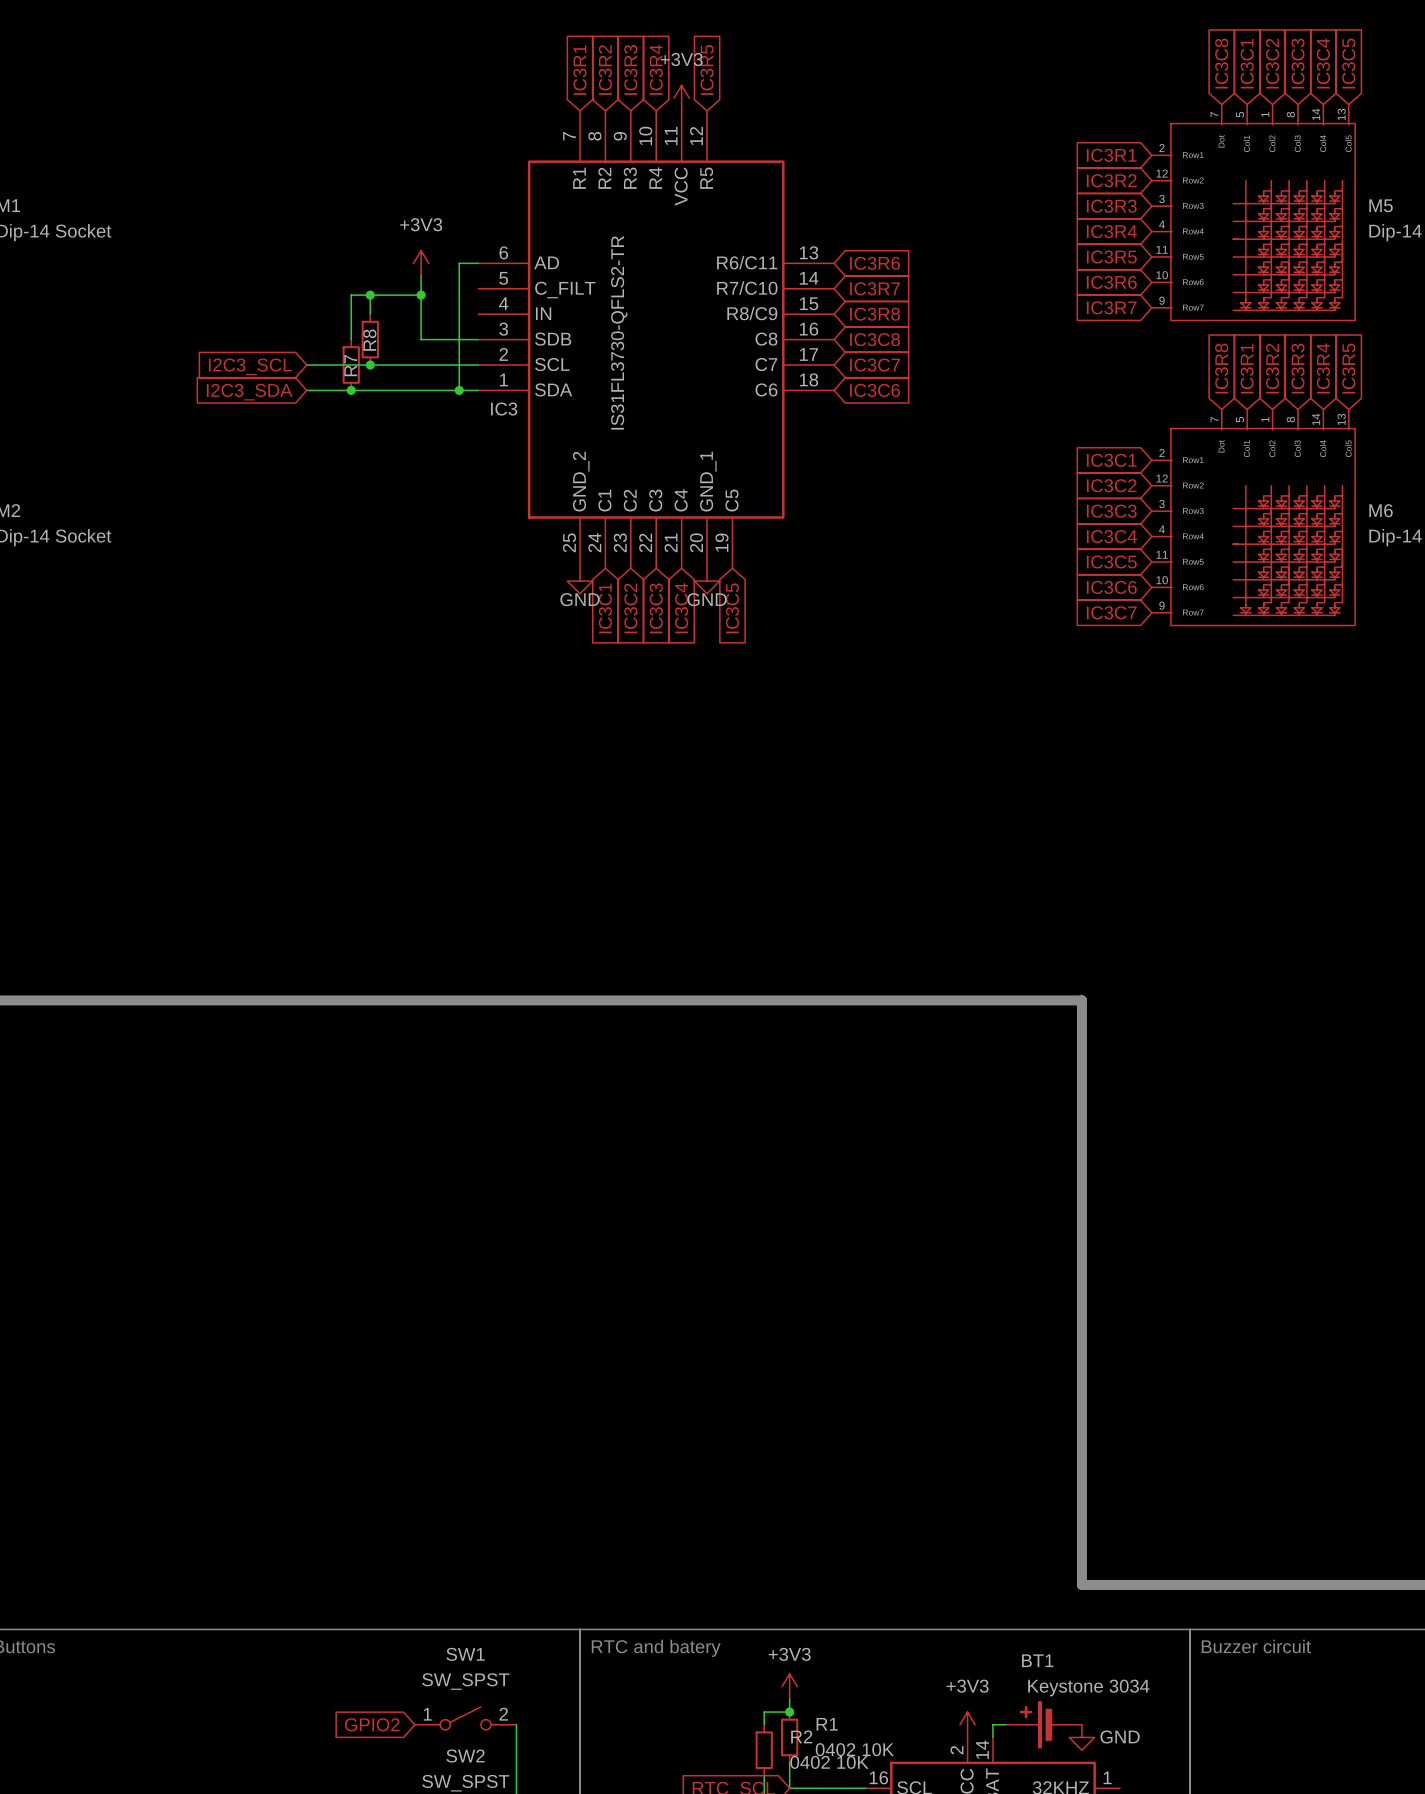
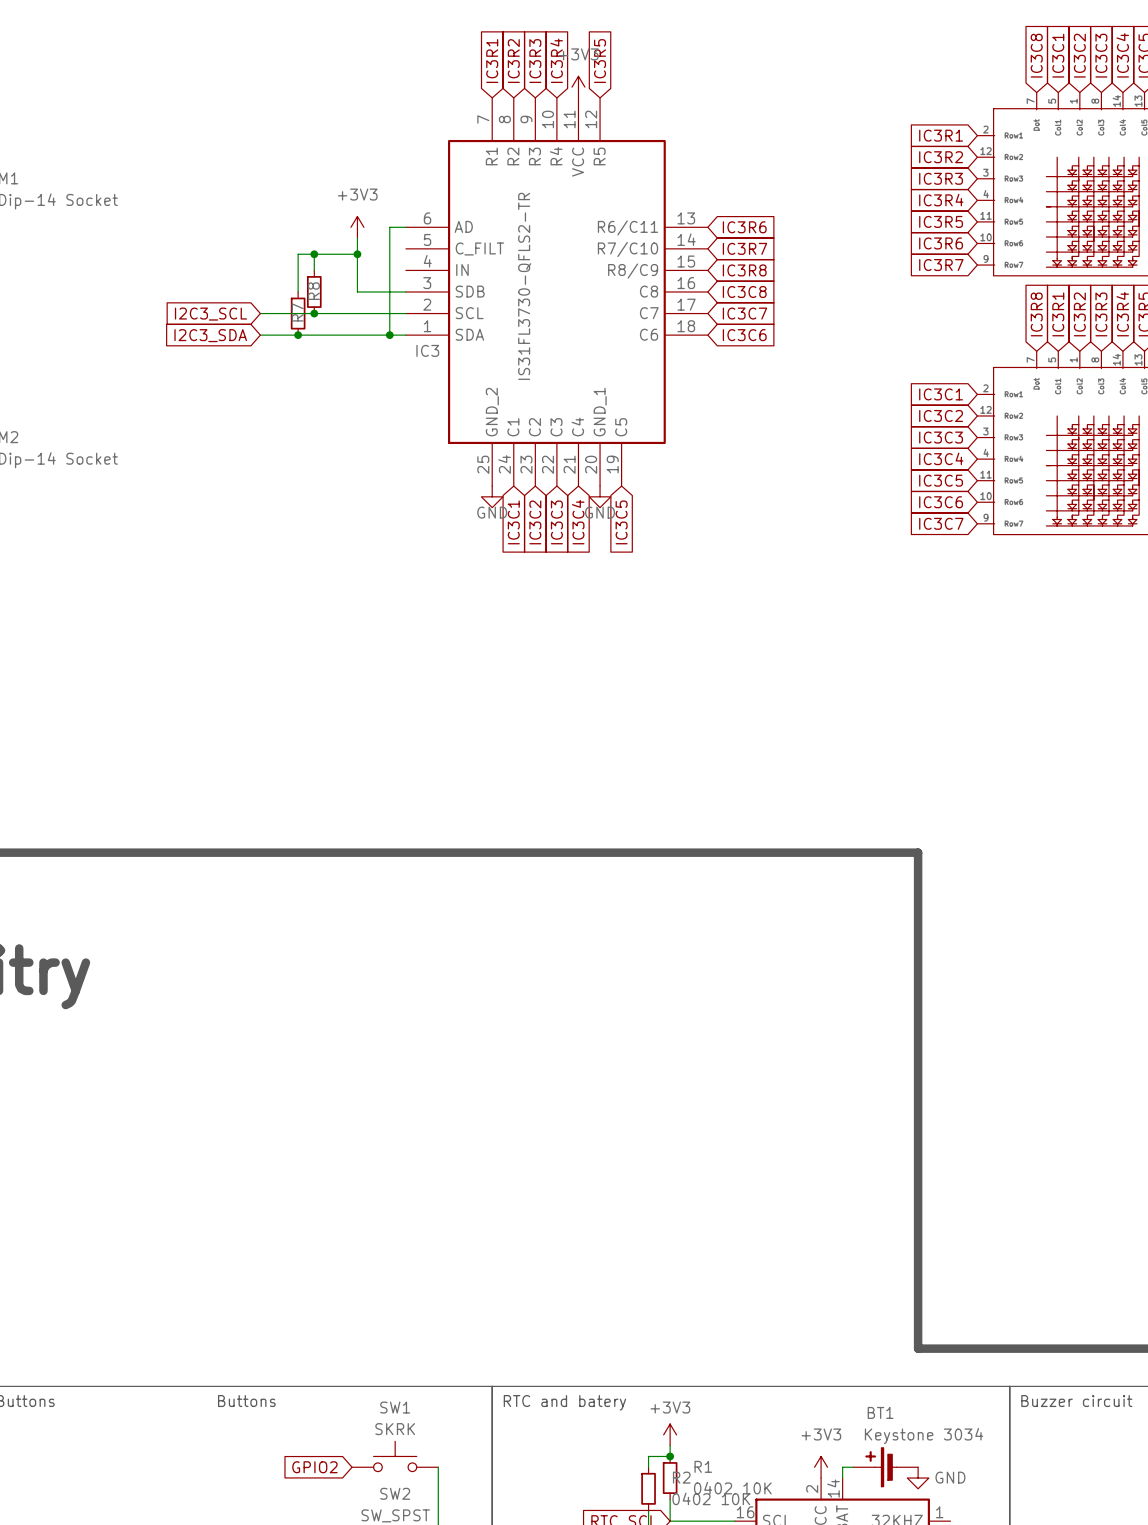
text: none -> Buttons (246, 1401)
SW1 value: SW_SPST (465, 1681) -> SKRK (395, 1429)
SW1 symbol: [414, 1706, 517, 1730] -> [352, 1441, 439, 1472]

